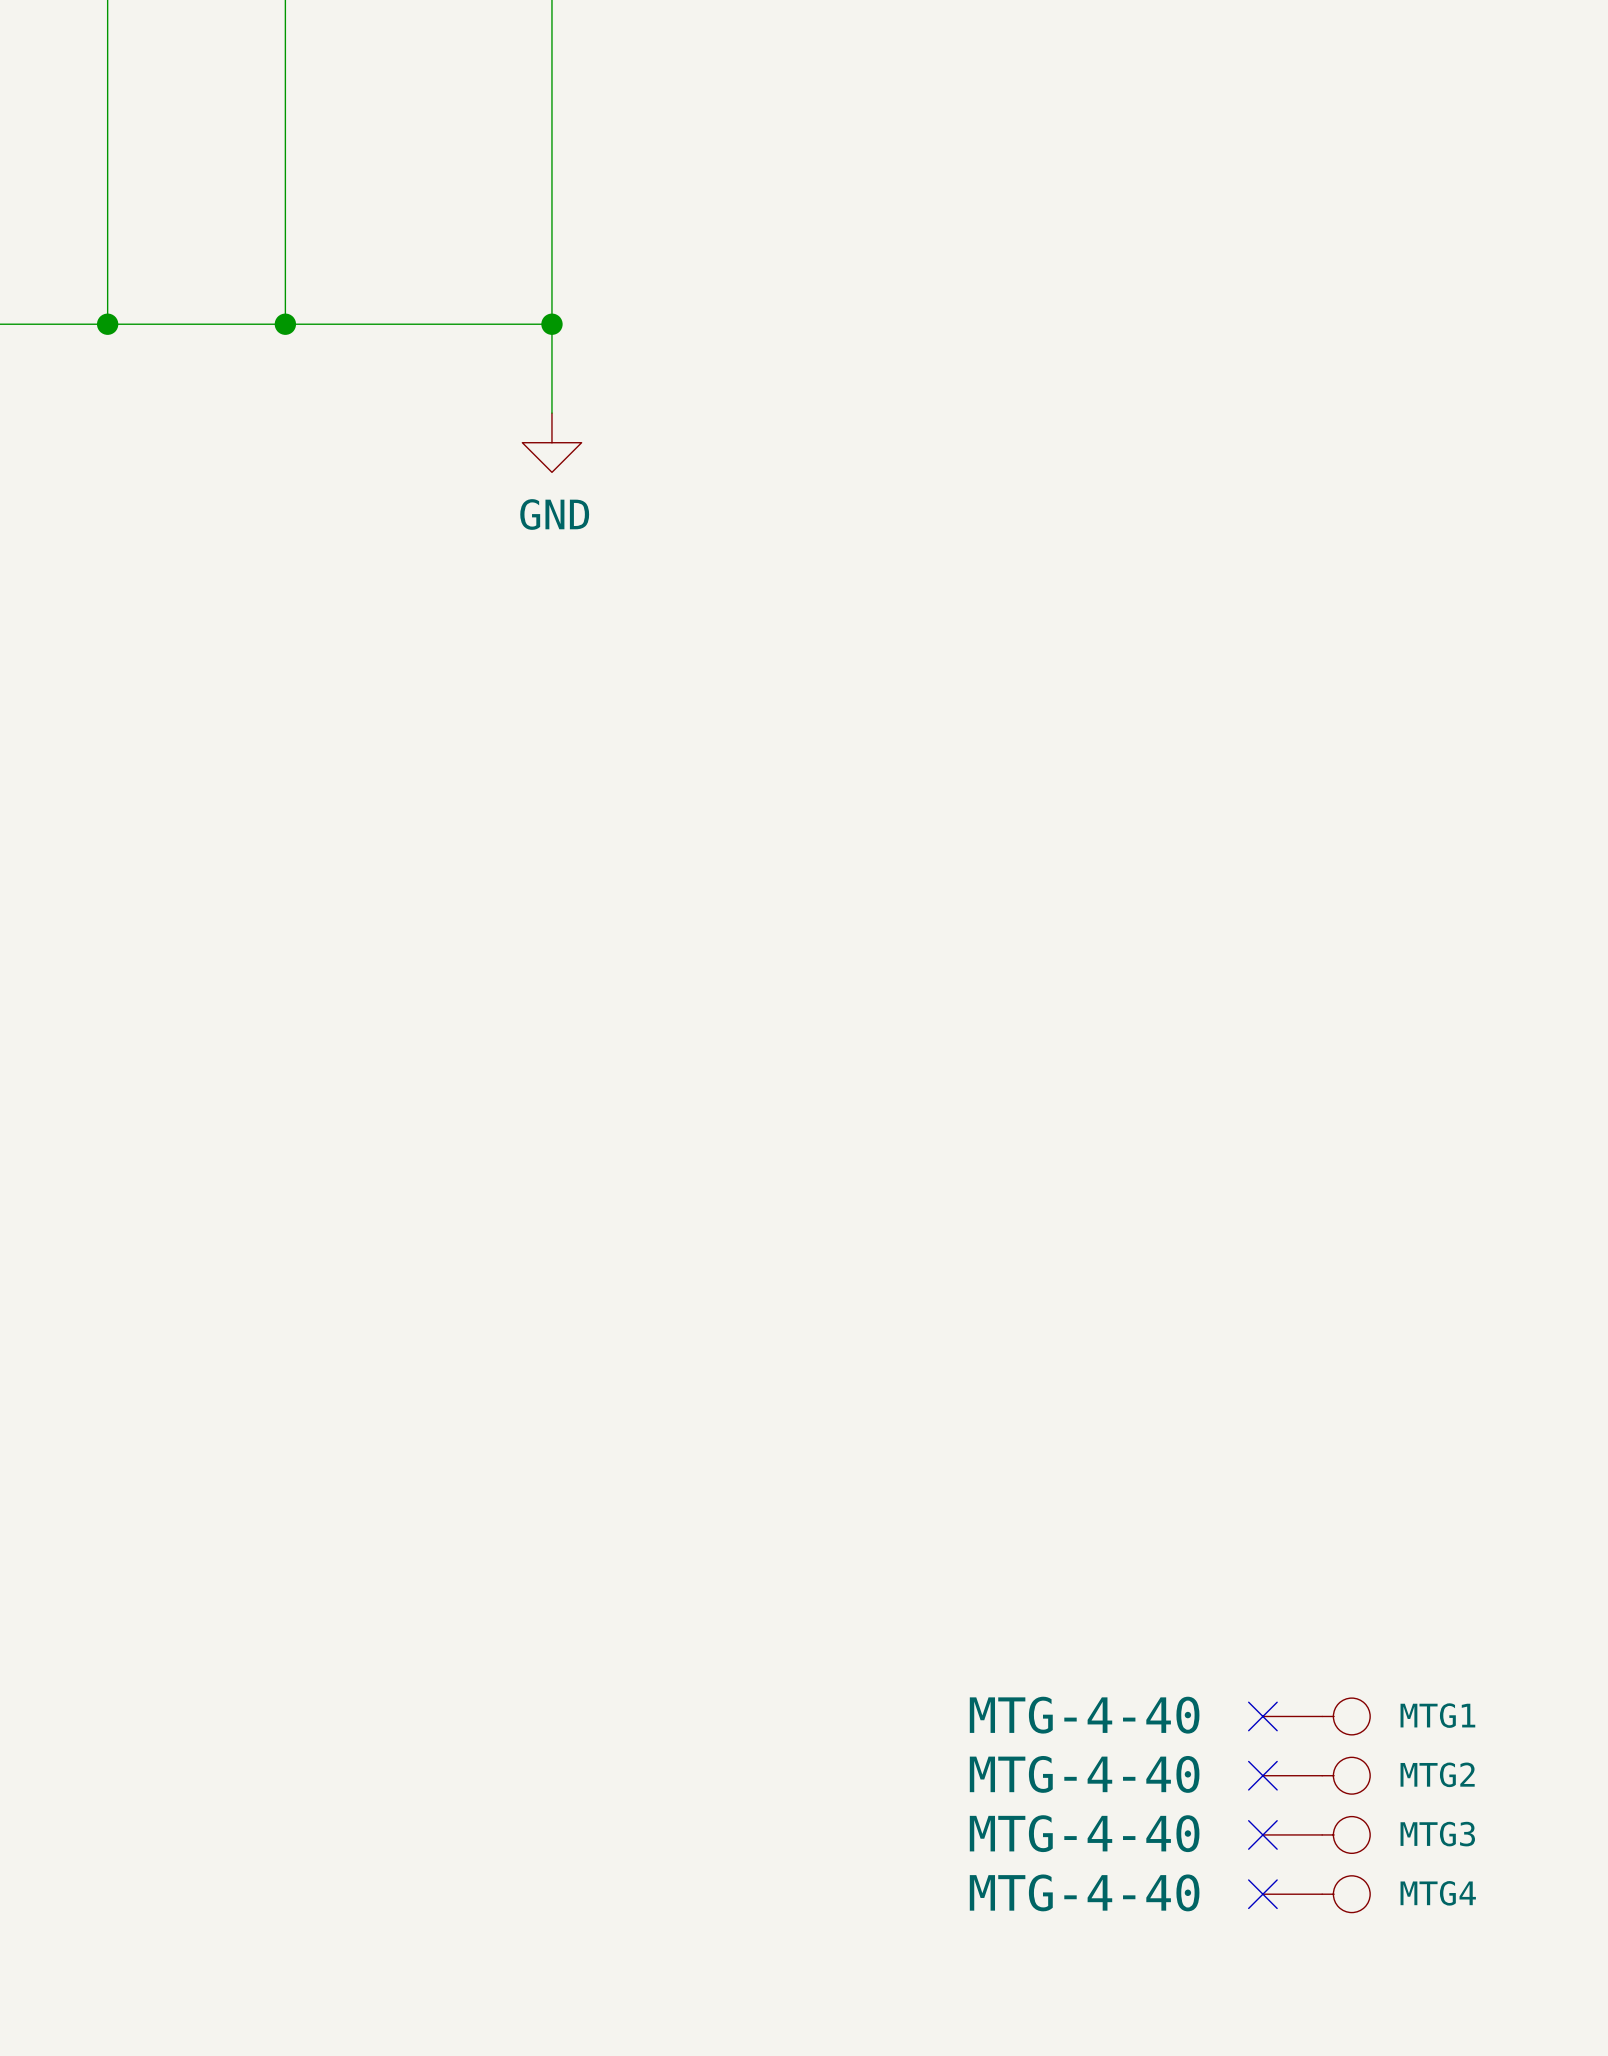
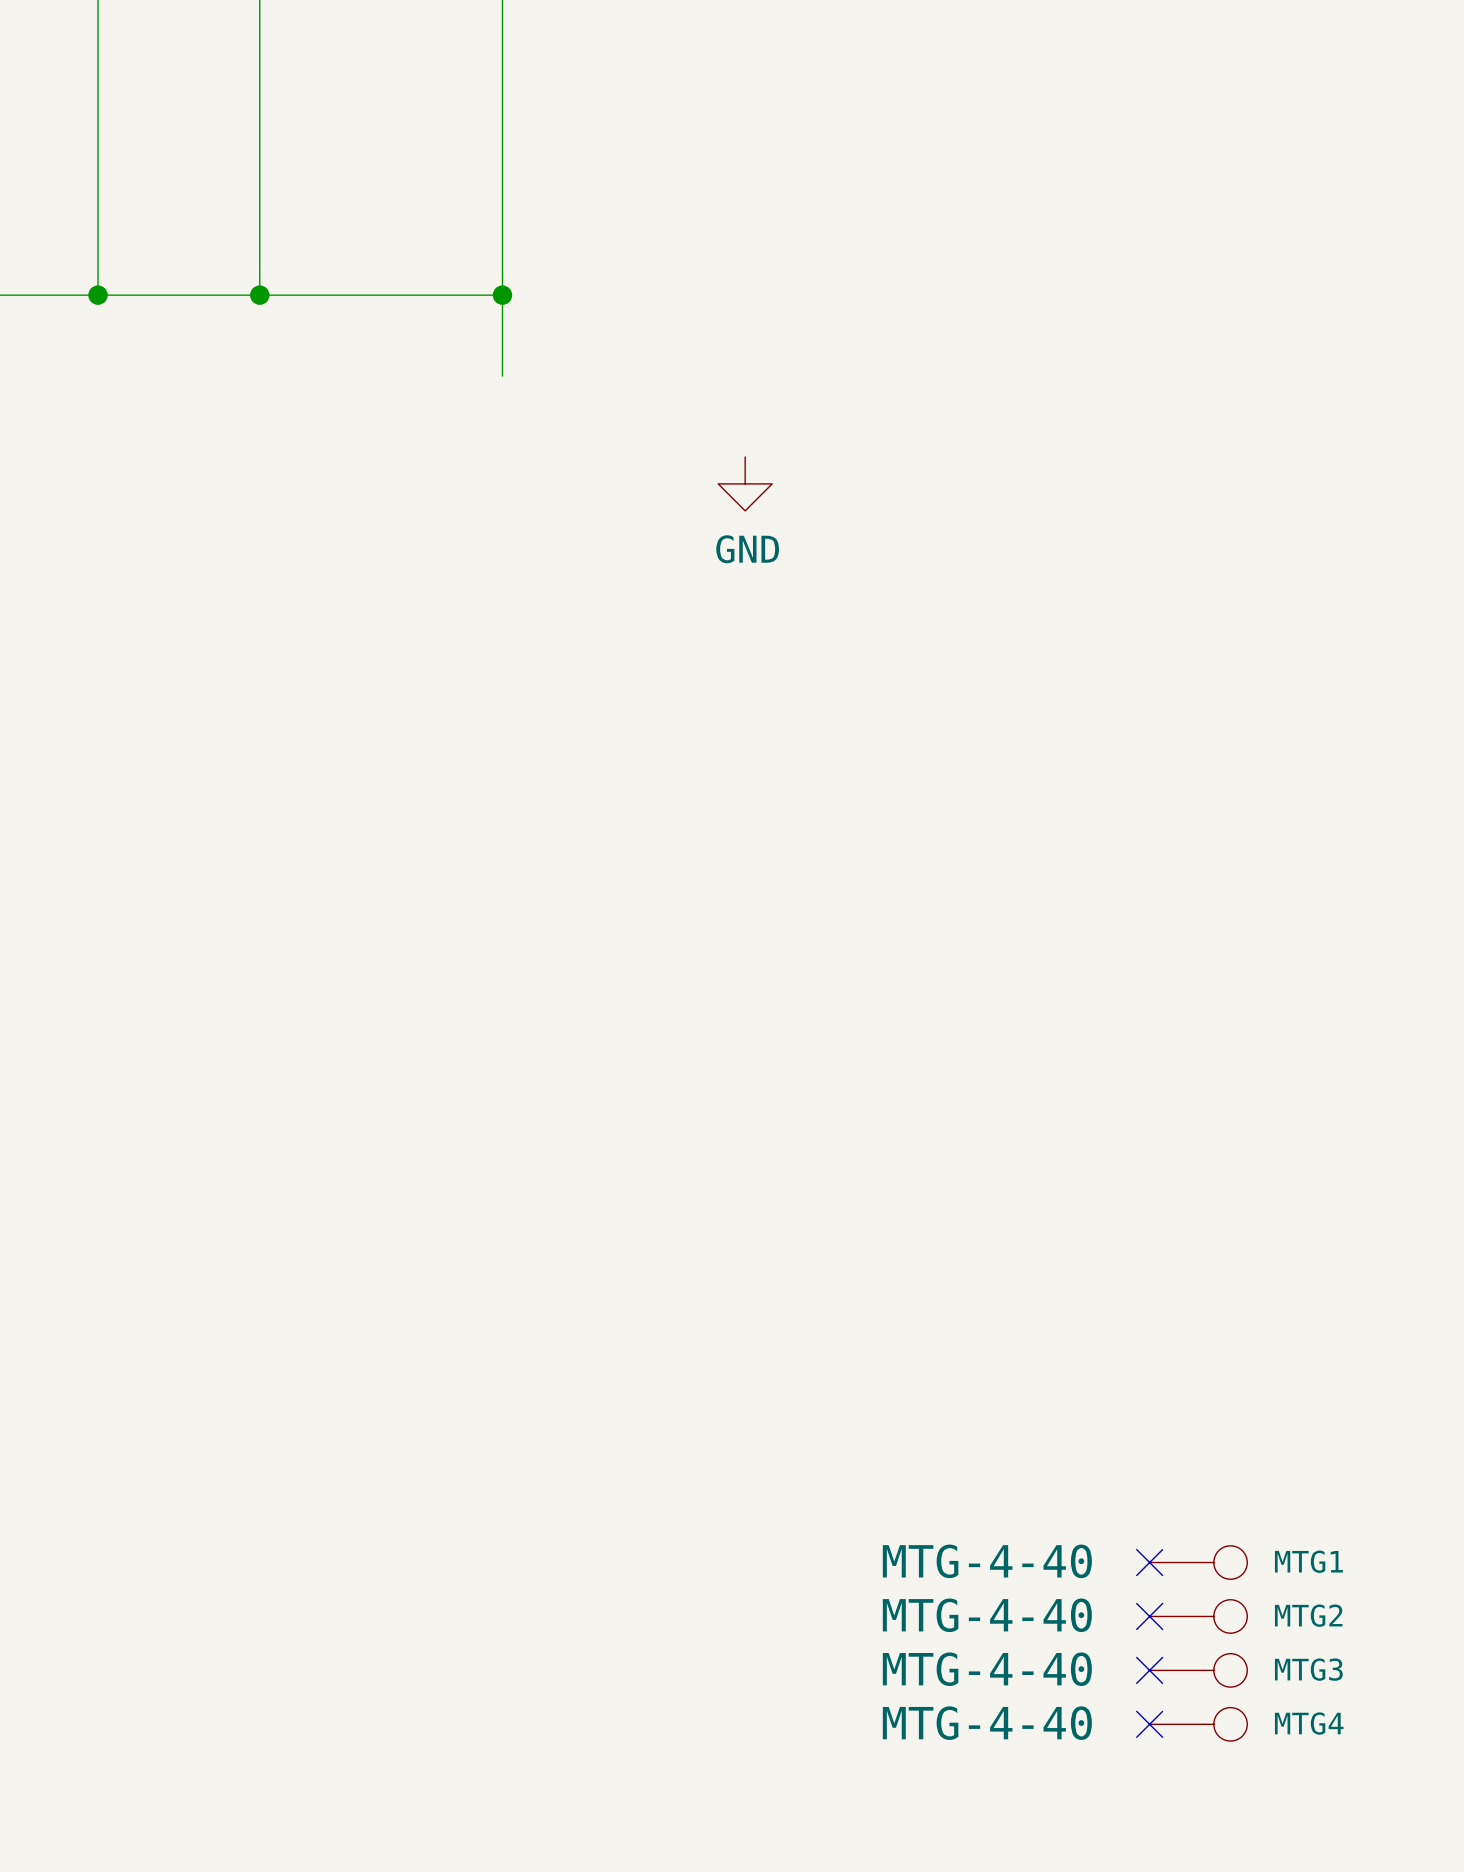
power symbol position: GND (551, 442) -> GND (745, 483)

